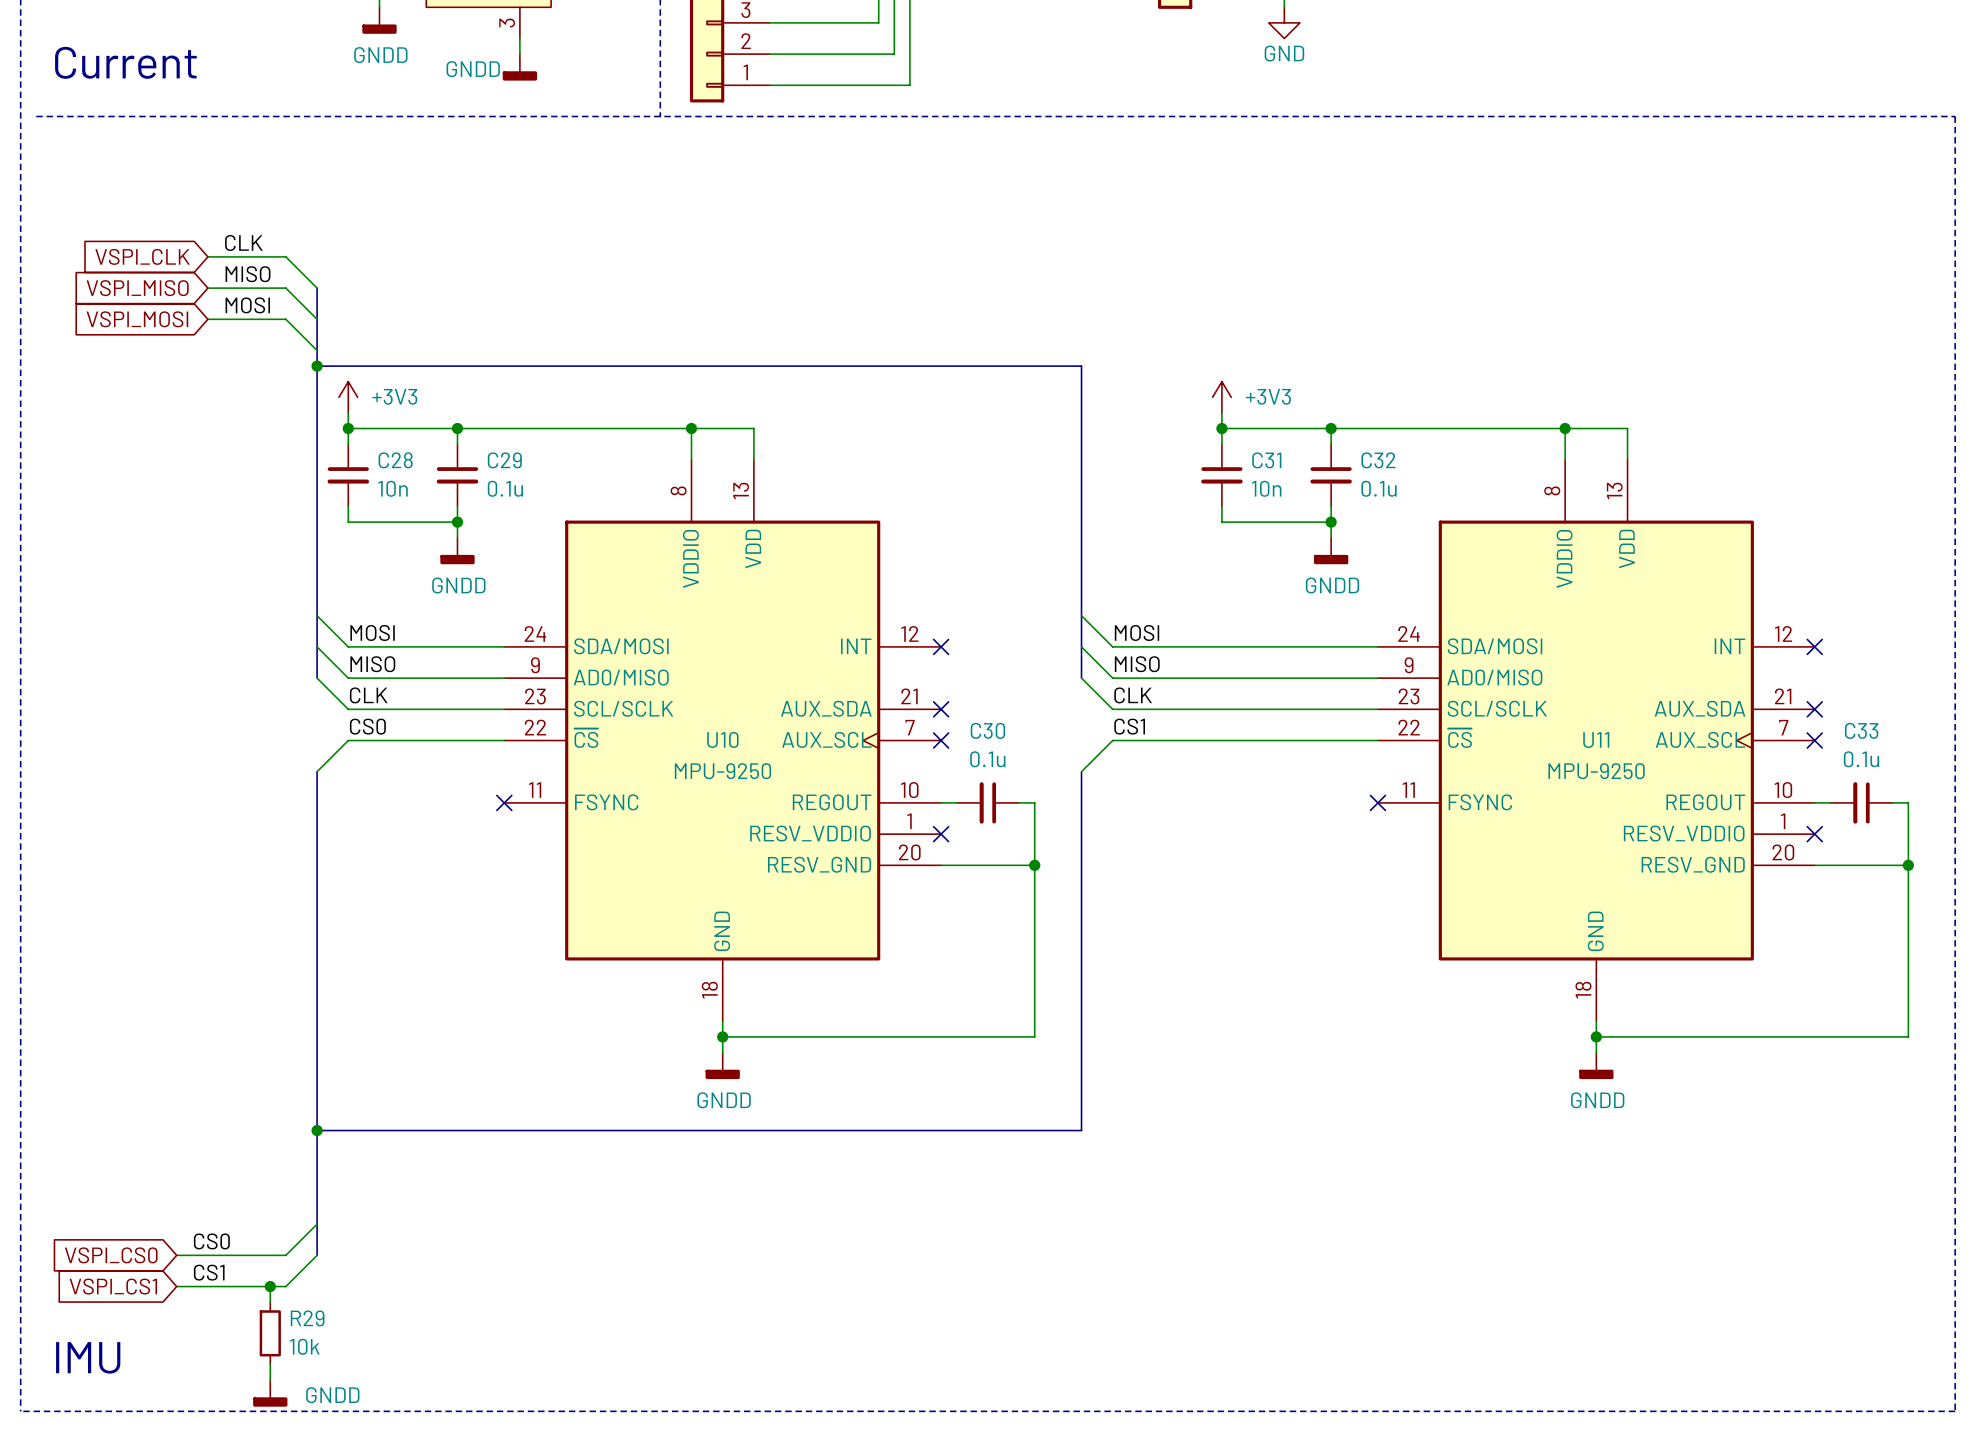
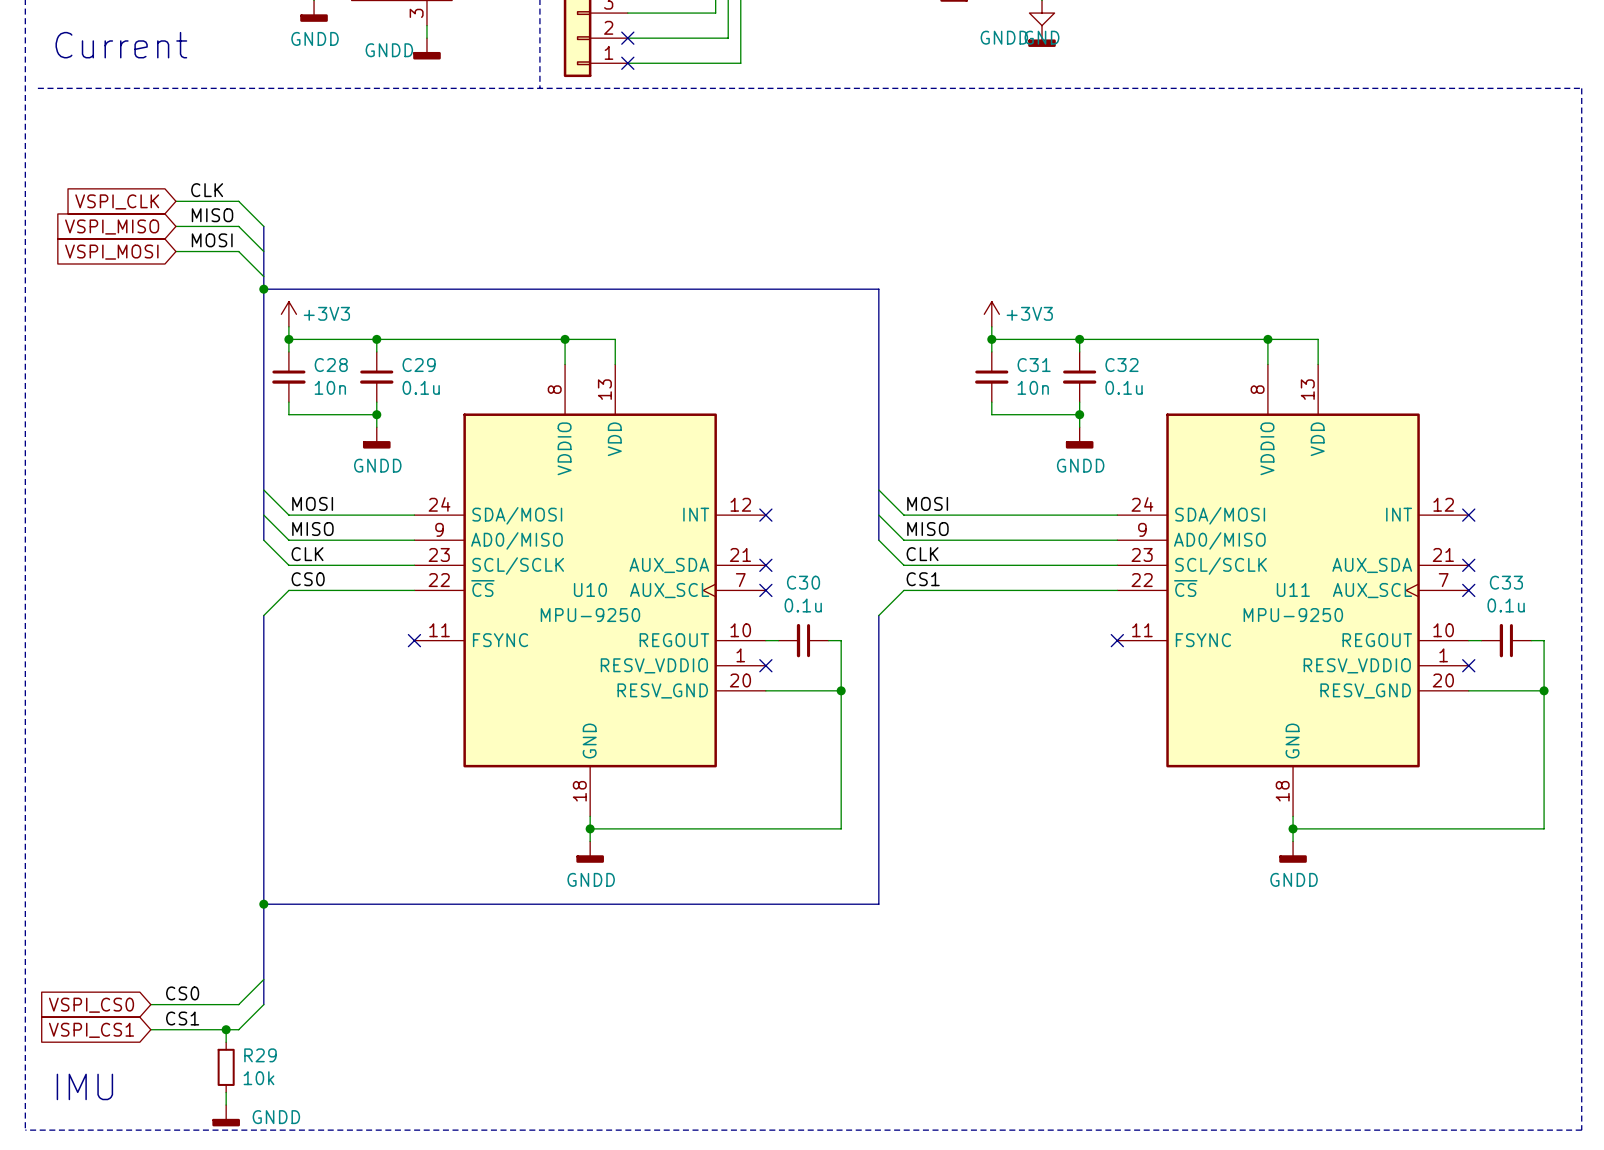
power symbol: none -> GNDD (1042, 36)
no-connect mark: none -> (627, 38)
no-connect mark: none -> (627, 63)

